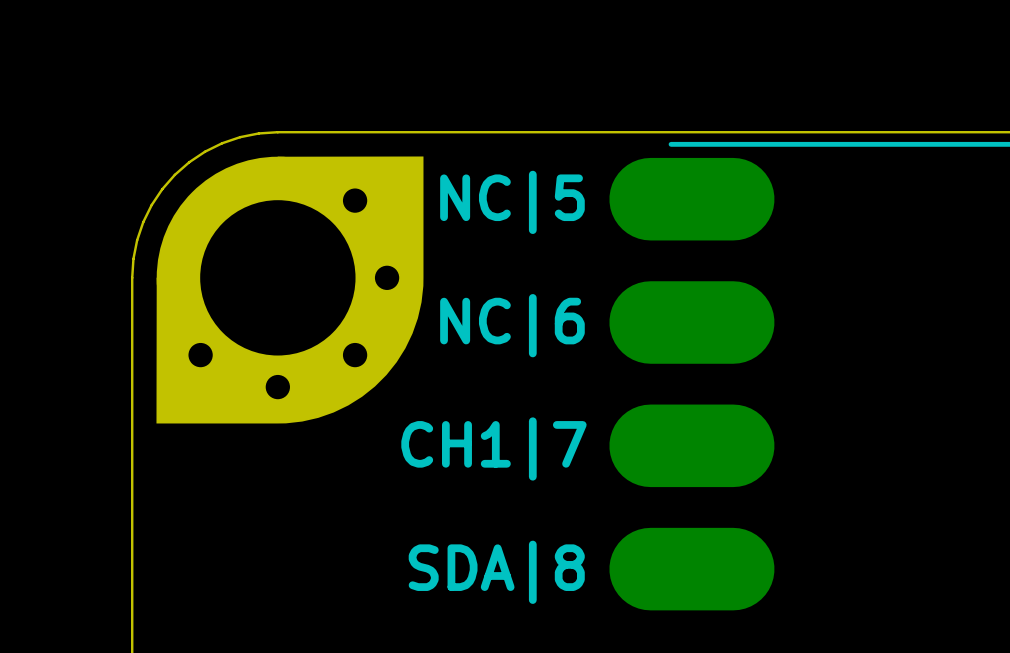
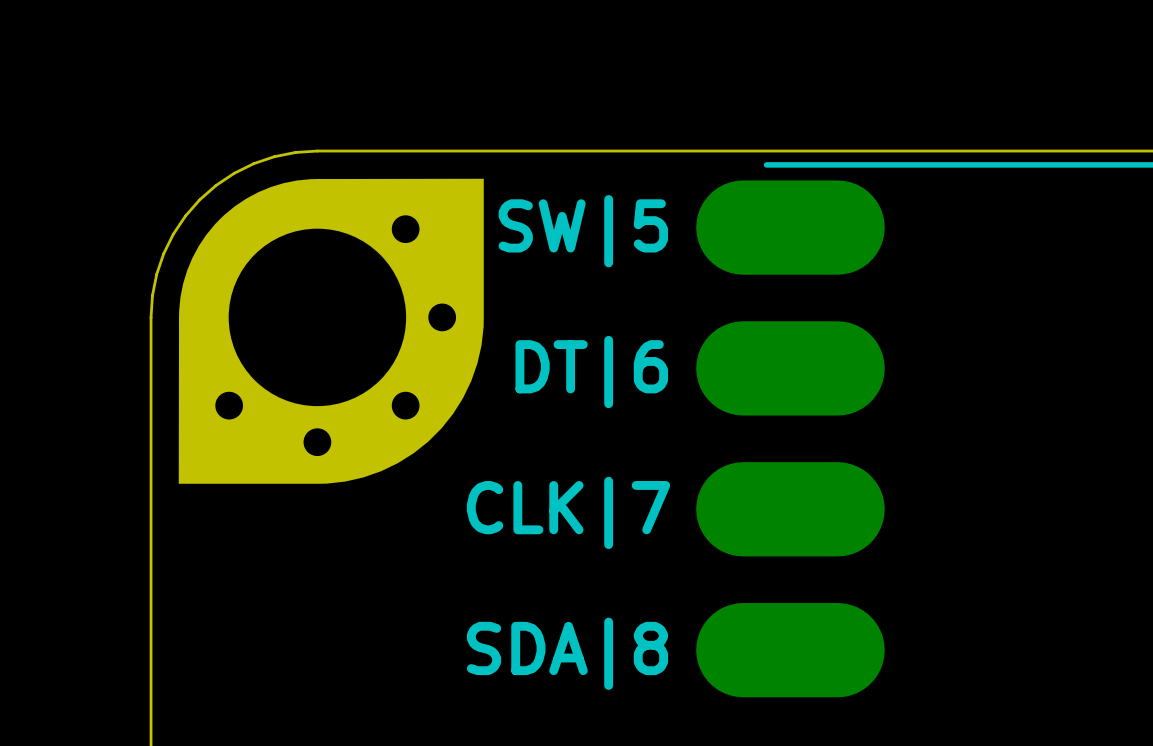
text: NC|5 (512, 202) -> SW|5 (583, 231)
text: NC|6 (512, 325) -> DT|6 (591, 372)
text: CH1|7 (493, 448) -> CLK|7 (568, 512)

